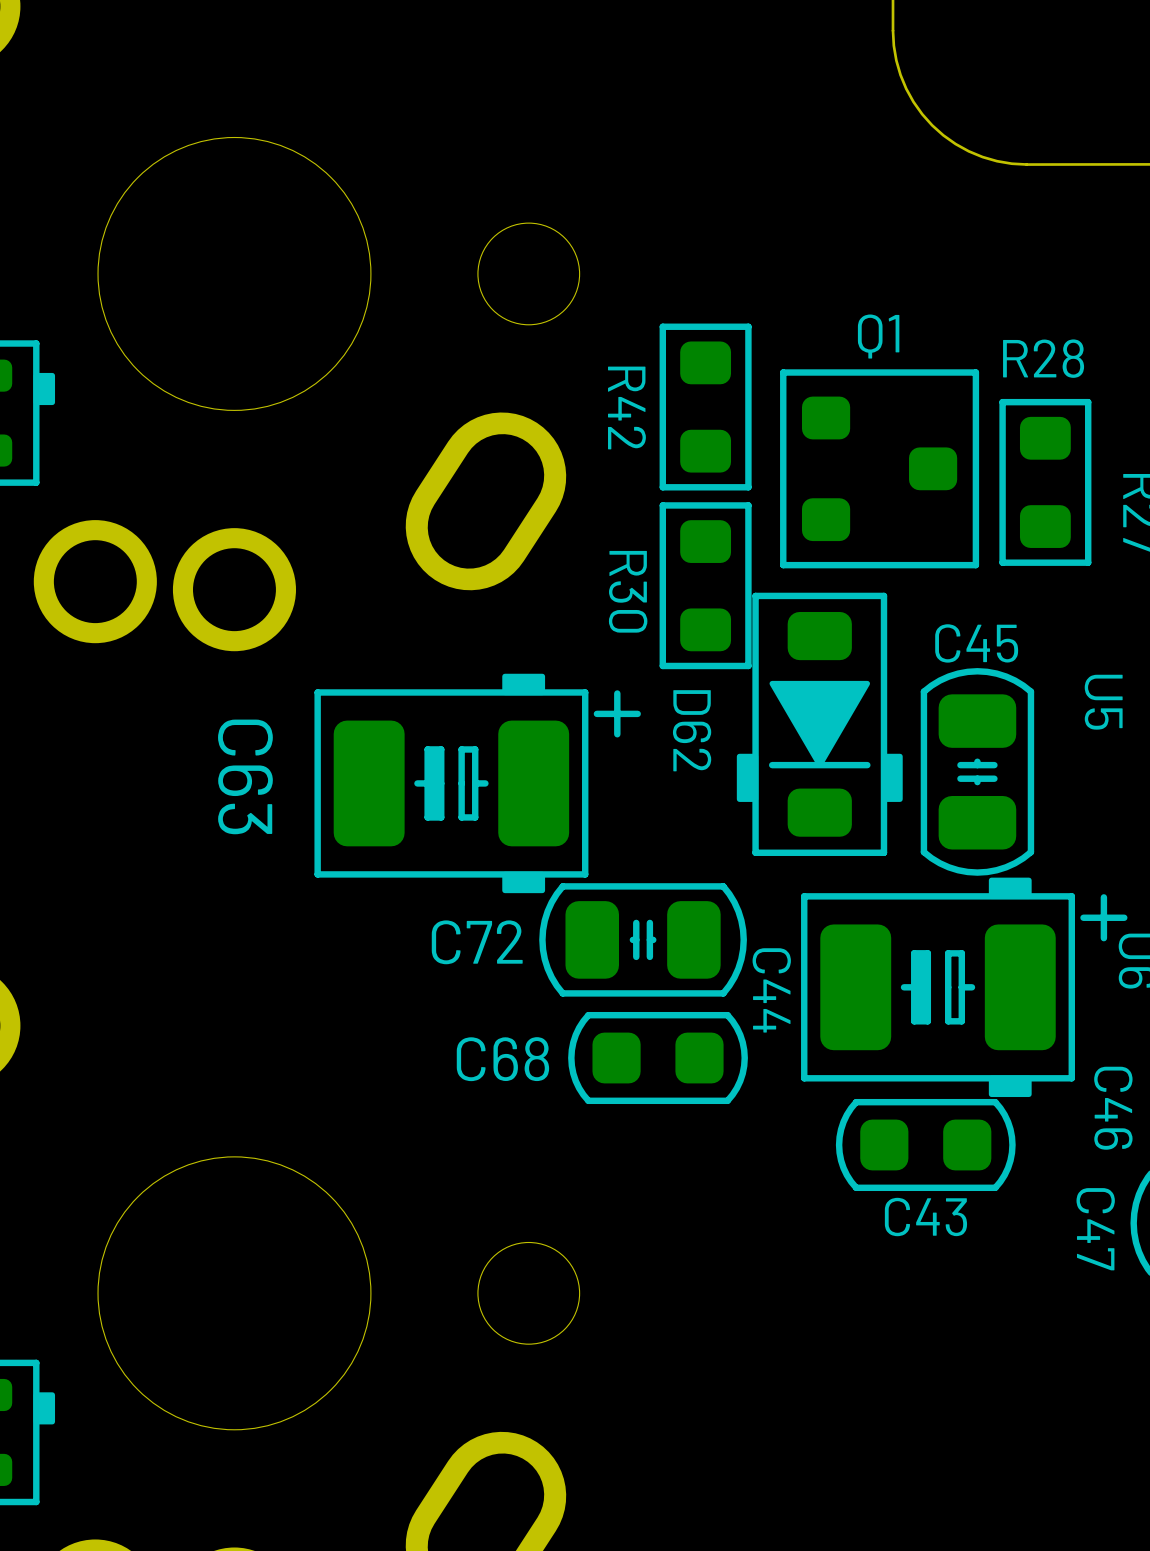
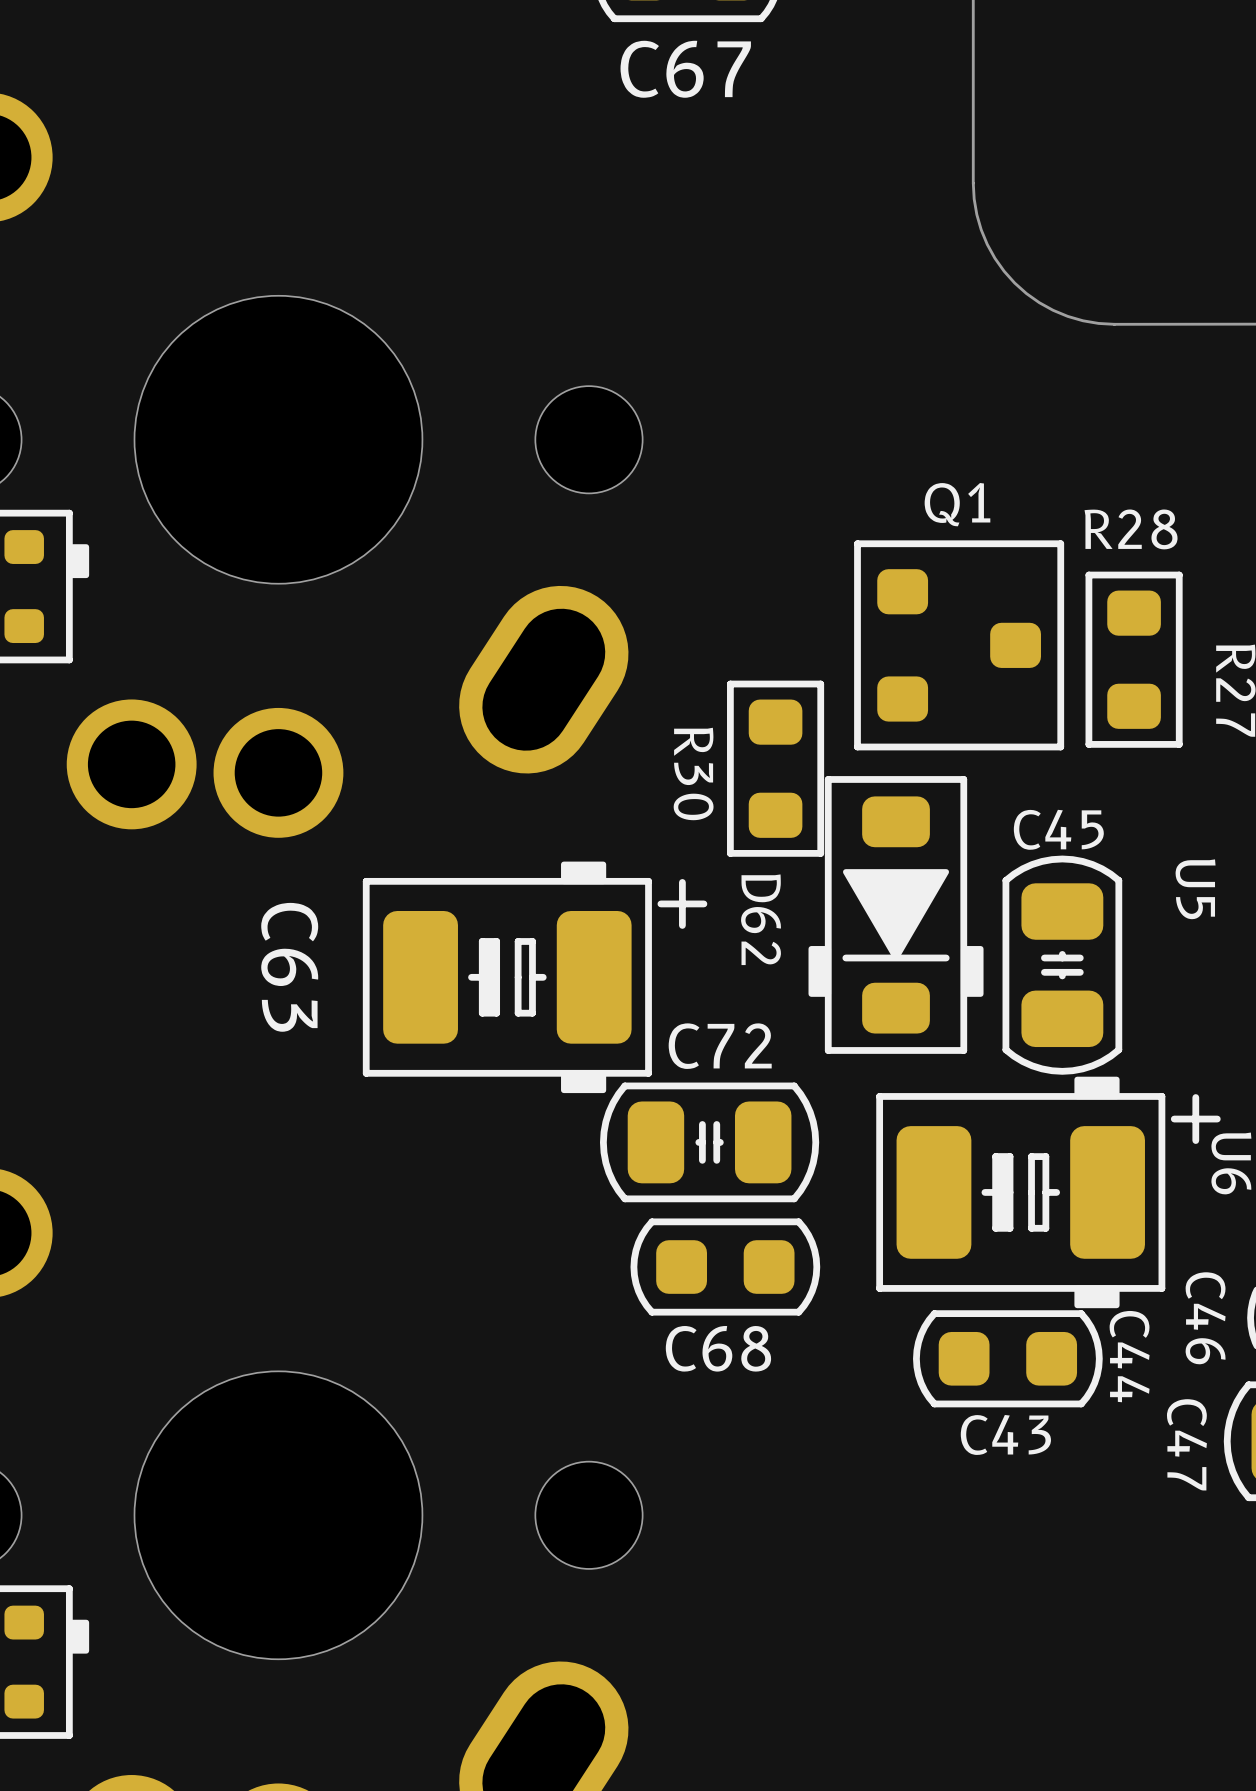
R42: (705, 407) -> none
C72 name position: C72 (477, 942) -> C72 (720, 1046)
C44 name position: C44 (771, 990) -> C44 (1129, 1356)
C68 name position: C68 (502, 1059) -> C68 (718, 1348)

